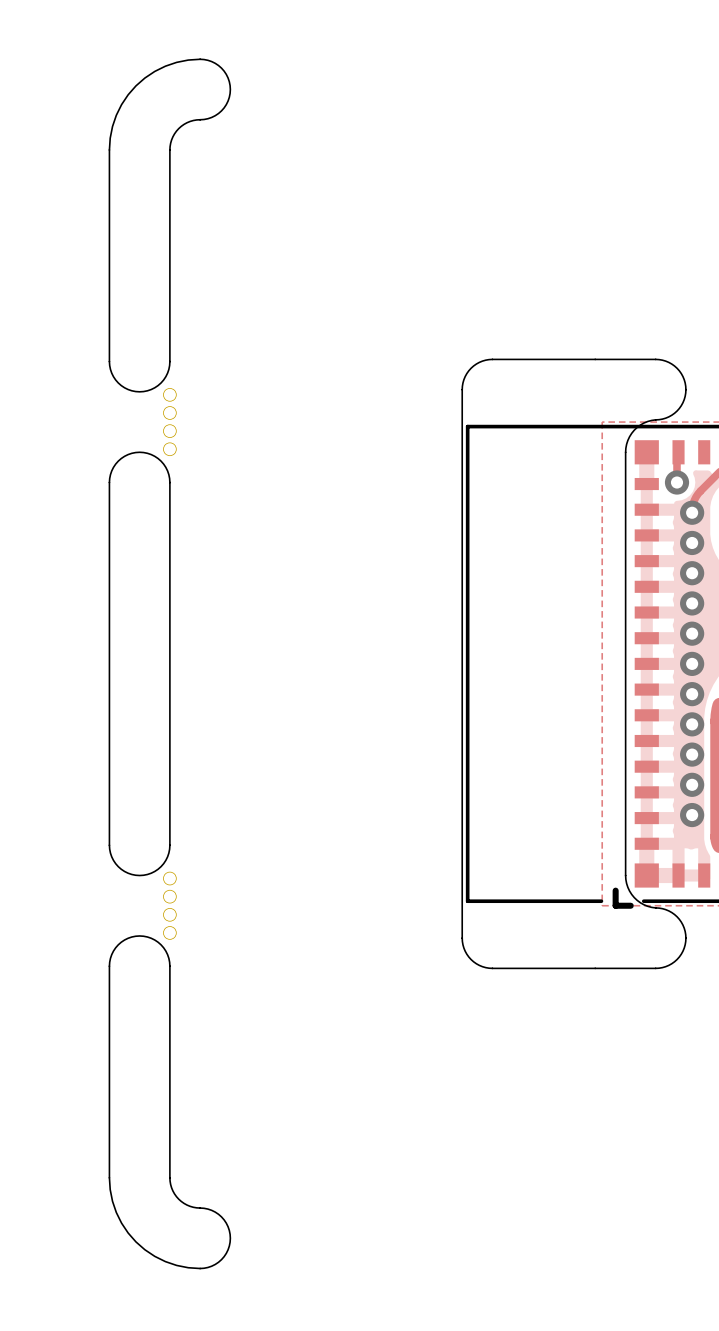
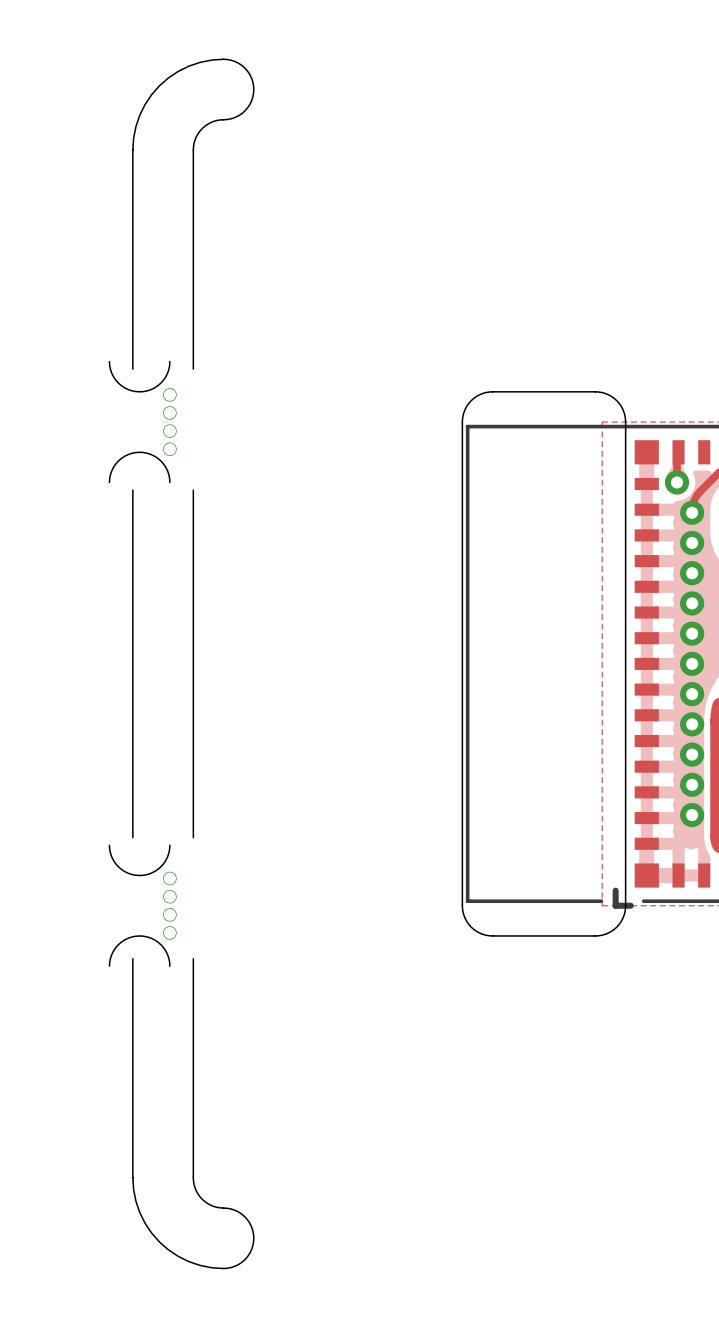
board edge: (109, 361) (109, 149) (112, 126) (121, 104) (128, 94) (144, 78) (154, 71) (176, 62) (204, 59) (215, 63) (224, 71) (229, 81) (230, 93) (226, 104) (218, 113) (207, 118) (193, 120) (184, 124) (176, 131) (170, 143) (169, 361) -> none
board edge: none -> (132, 369) (132, 149) (135, 126) (139, 115) (151, 94) (168, 78) (178, 71) (200, 62) (227, 59) (238, 63) (247, 71) (252, 81) (253, 93) (249, 104) (241, 113) (231, 118) (216, 120) (207, 124) (197, 133) (194, 143) (193, 369)
board edge: (625, 452) (629, 436) (637, 427) (647, 421) (668, 416) (677, 411) (682, 402) (685, 389) (684, 379) (677, 368) (668, 362) (655, 359) (489, 359) (473, 366) (465, 376) (462, 389) (462, 938) (465, 951) (473, 961) (489, 968) (655, 968) (668, 965) (677, 959) (684, 948) (685, 938) (682, 925) (677, 916) (668, 910) (647, 906) (637, 900) (629, 891) (625, 875) -> (625, 452) (623, 412) (616, 400) (602, 392) (489, 392) (473, 398) (467, 405) (463, 415) (462, 905) (464, 915) (473, 929) (489, 935) (602, 935) (616, 927) (623, 915) (625, 875)
board edge: (109, 482) (109, 845) -> none
board edge: (169, 482) (169, 845) -> none
board edge: none -> (132, 490) (132, 837)
board edge: none -> (193, 490) (193, 837)
board edge: none -> (132, 958) (132, 1177) (135, 1201) (145, 1223) (151, 1233) (168, 1249) (188, 1261) (200, 1265) (227, 1268) (238, 1264) (247, 1256) (252, 1246) (253, 1234) (249, 1223) (241, 1214) (231, 1209) (216, 1207) (207, 1203) (197, 1193) (194, 1184) (193, 958)
board edge: (109, 966) (109, 1177) (112, 1201) (121, 1223) (128, 1233) (144, 1249) (154, 1256) (176, 1265) (204, 1268) (215, 1264) (224, 1256) (229, 1246) (230, 1234) (226, 1223) (218, 1214) (207, 1209) (193, 1207) (184, 1203) (176, 1196) (170, 1184) (169, 966) -> none

